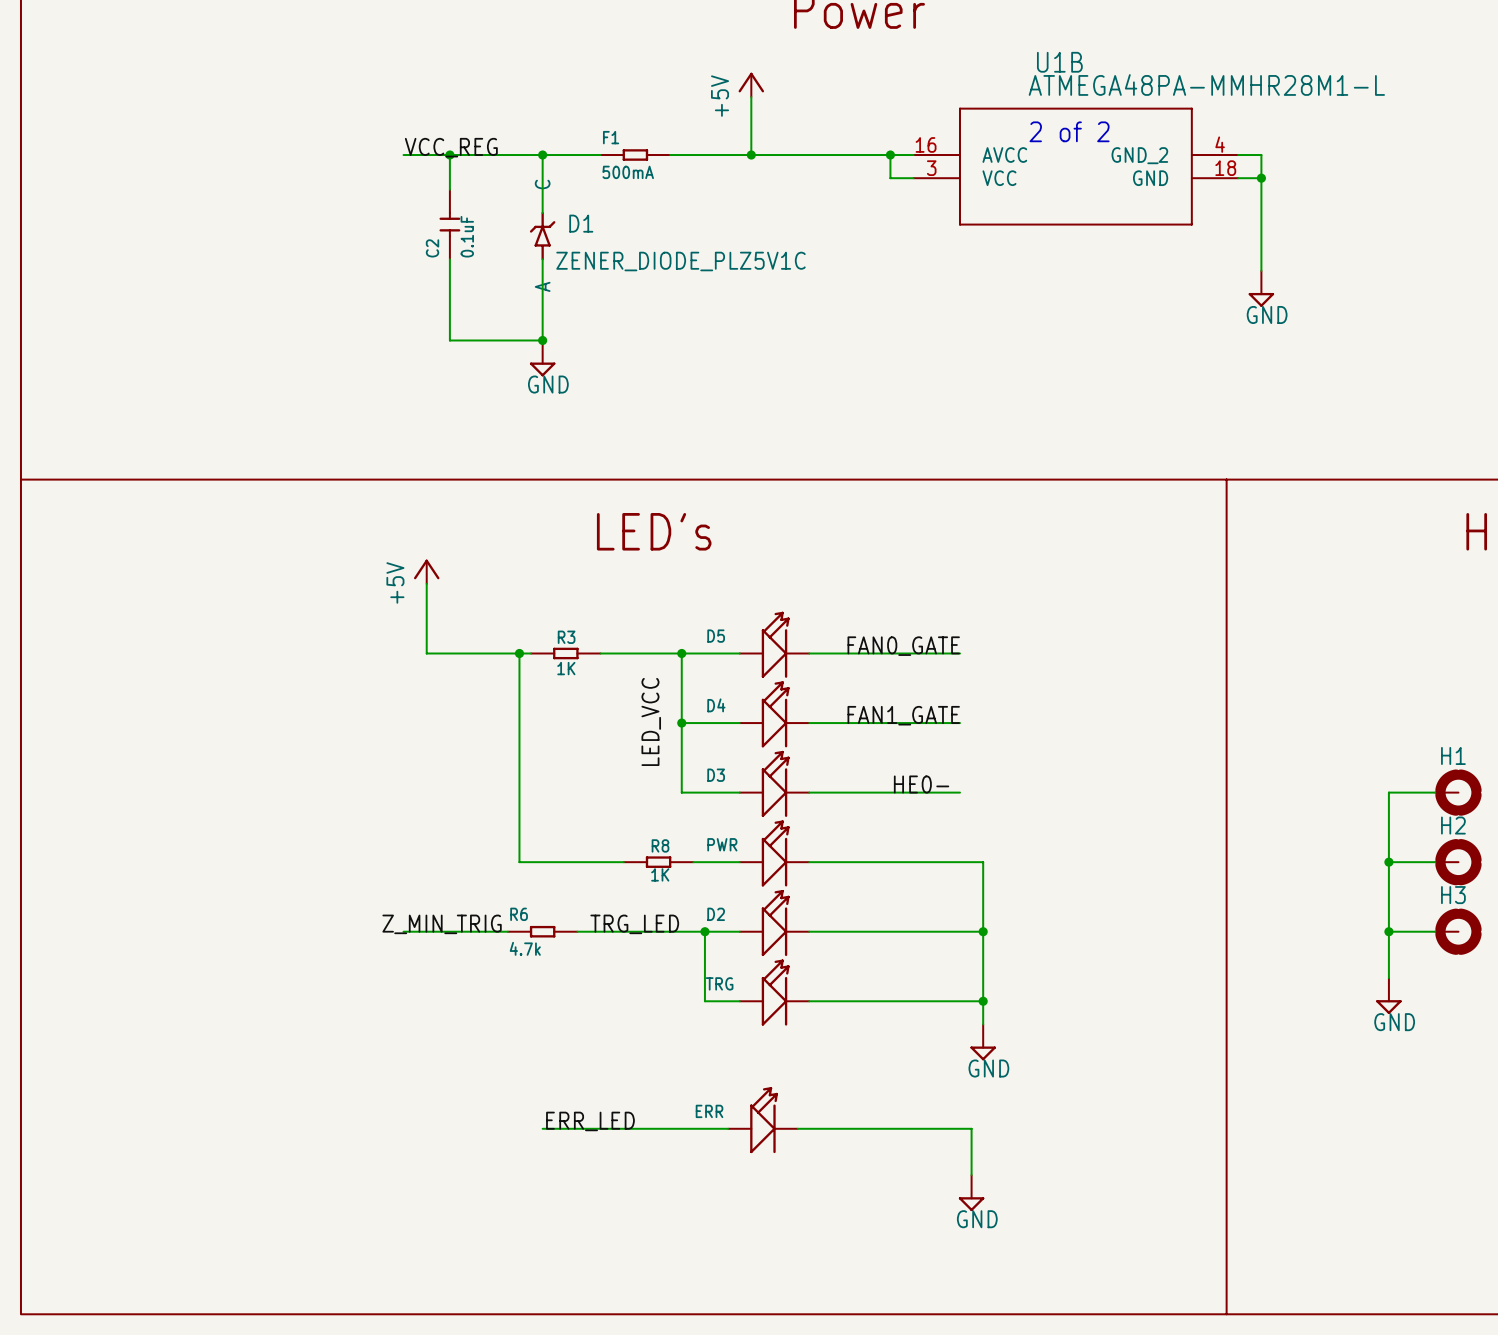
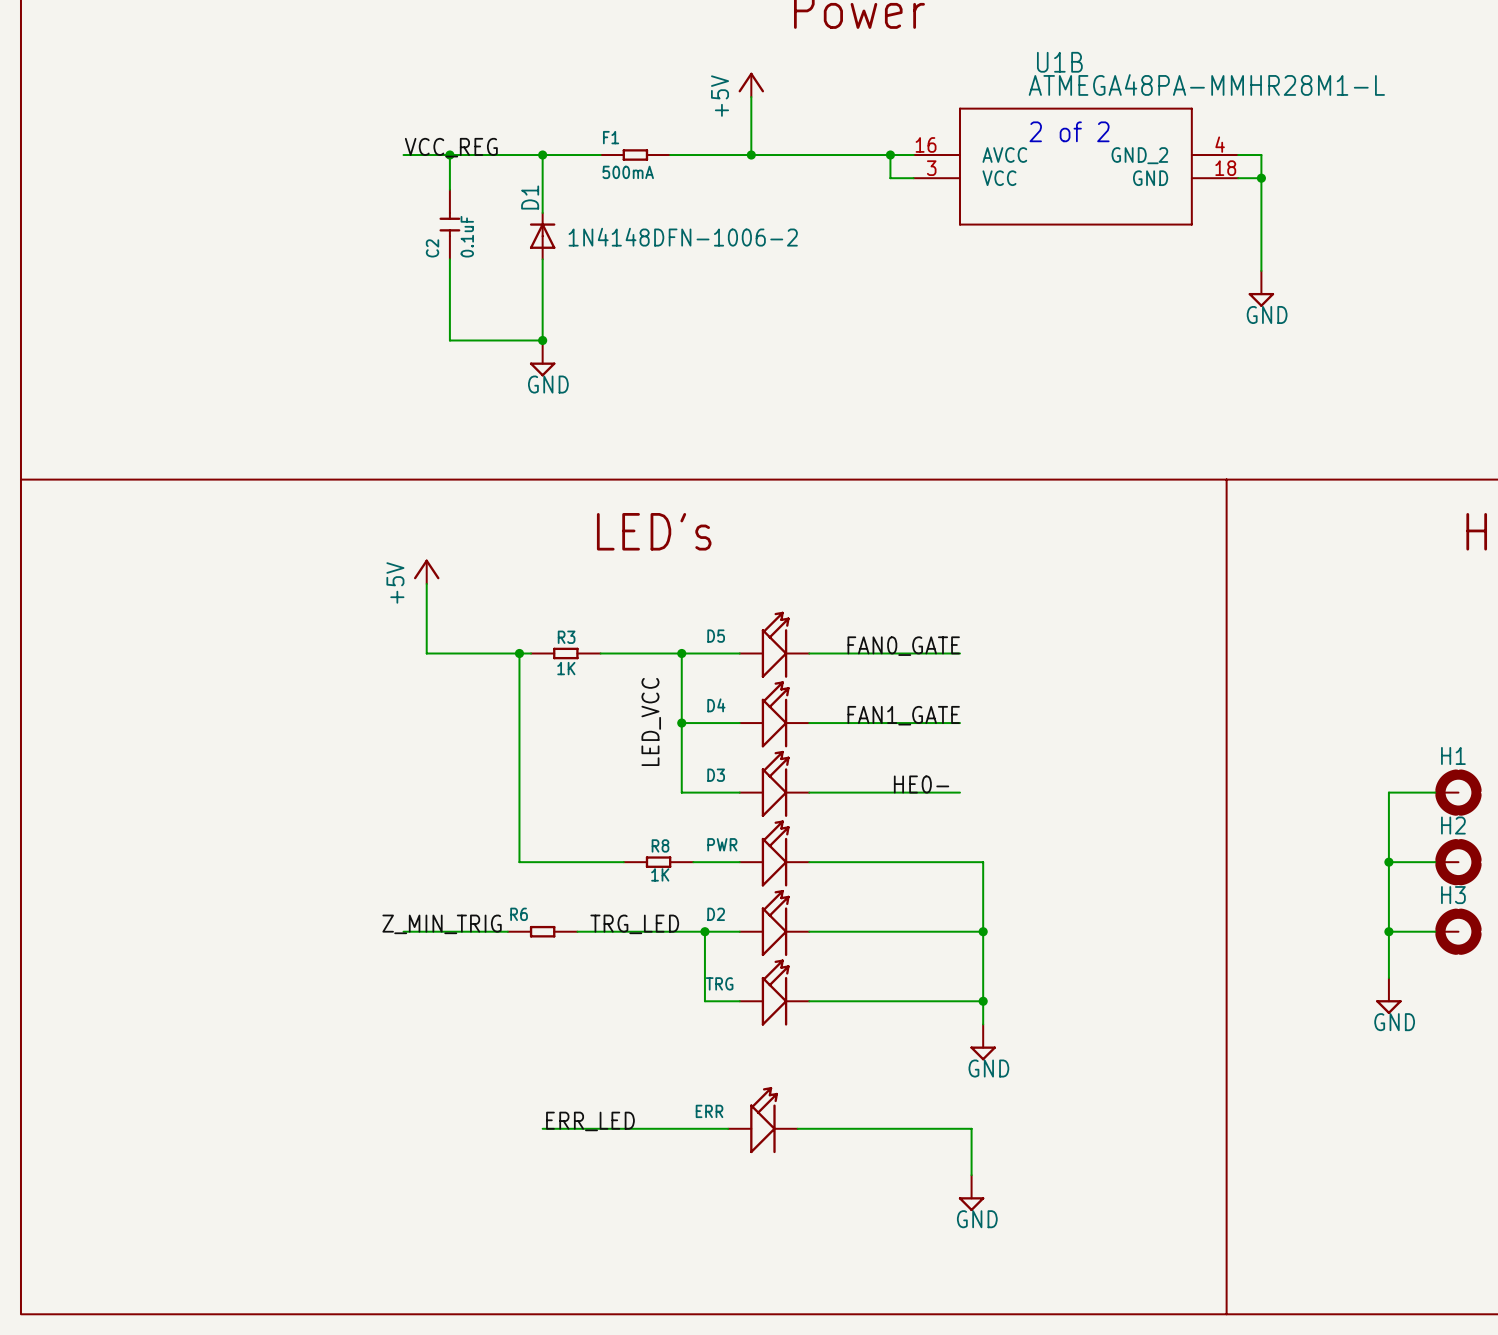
D1 symbol: [529, 211, 556, 261] -> [529, 212, 556, 260]
D1 name position: D1 (581, 223) -> D1 (530, 197)
D1 value: ZENER_DIODE_PLZ5V1C (680, 261) -> 1N4148DFN-1006-2 (683, 237)
R6 value: 4.7k (525, 948) -> none

